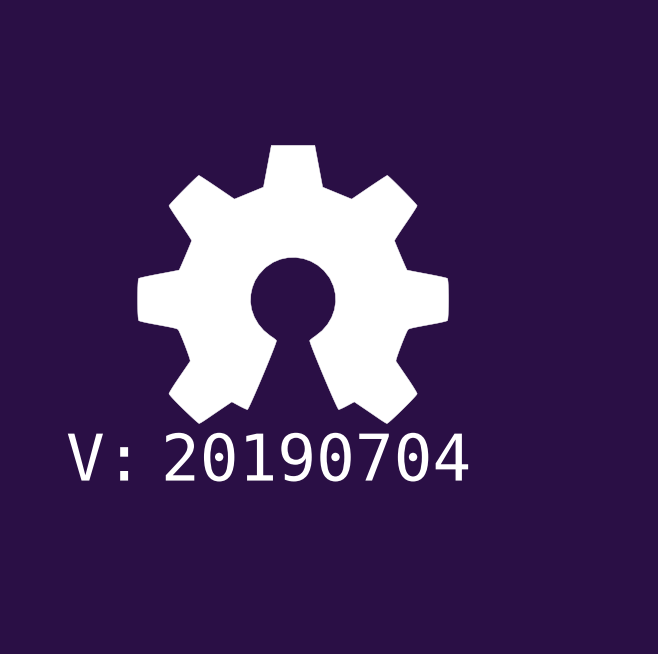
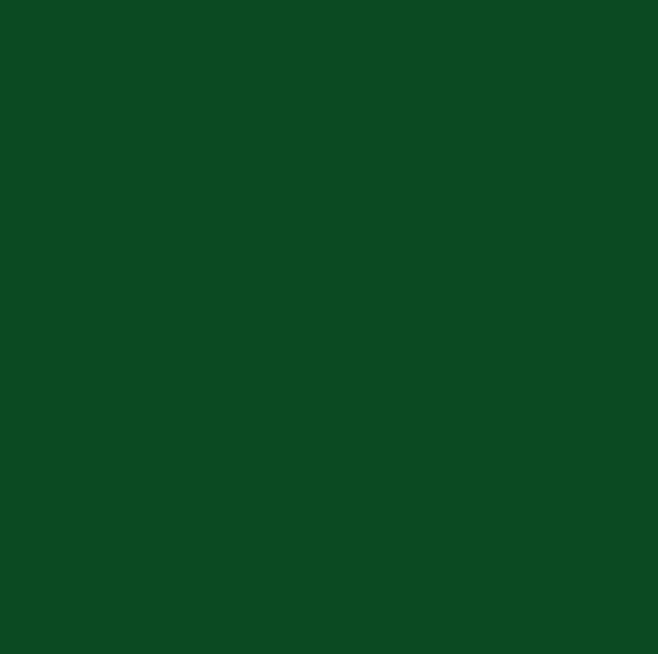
drawing: [137, 145, 449, 424] -> none

